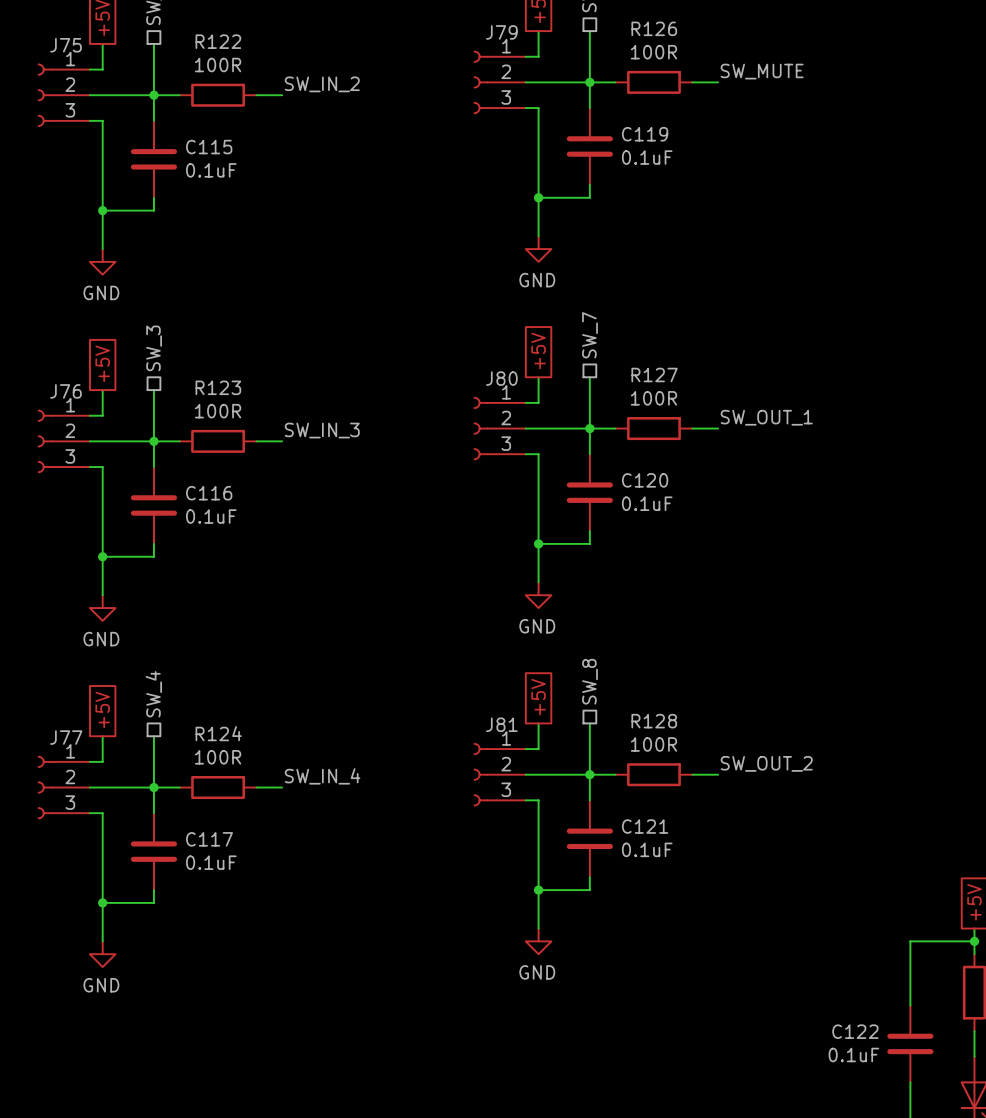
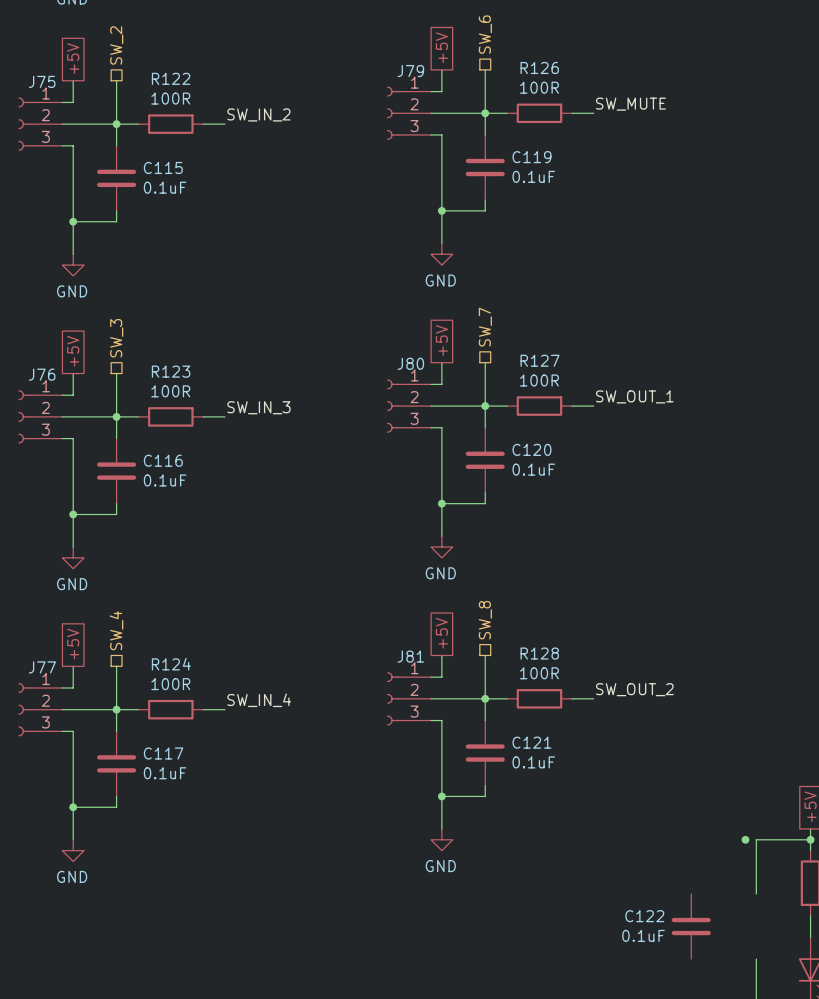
junction: none -> (745, 839)
C122 position: (910, 1043) -> (691, 926)

